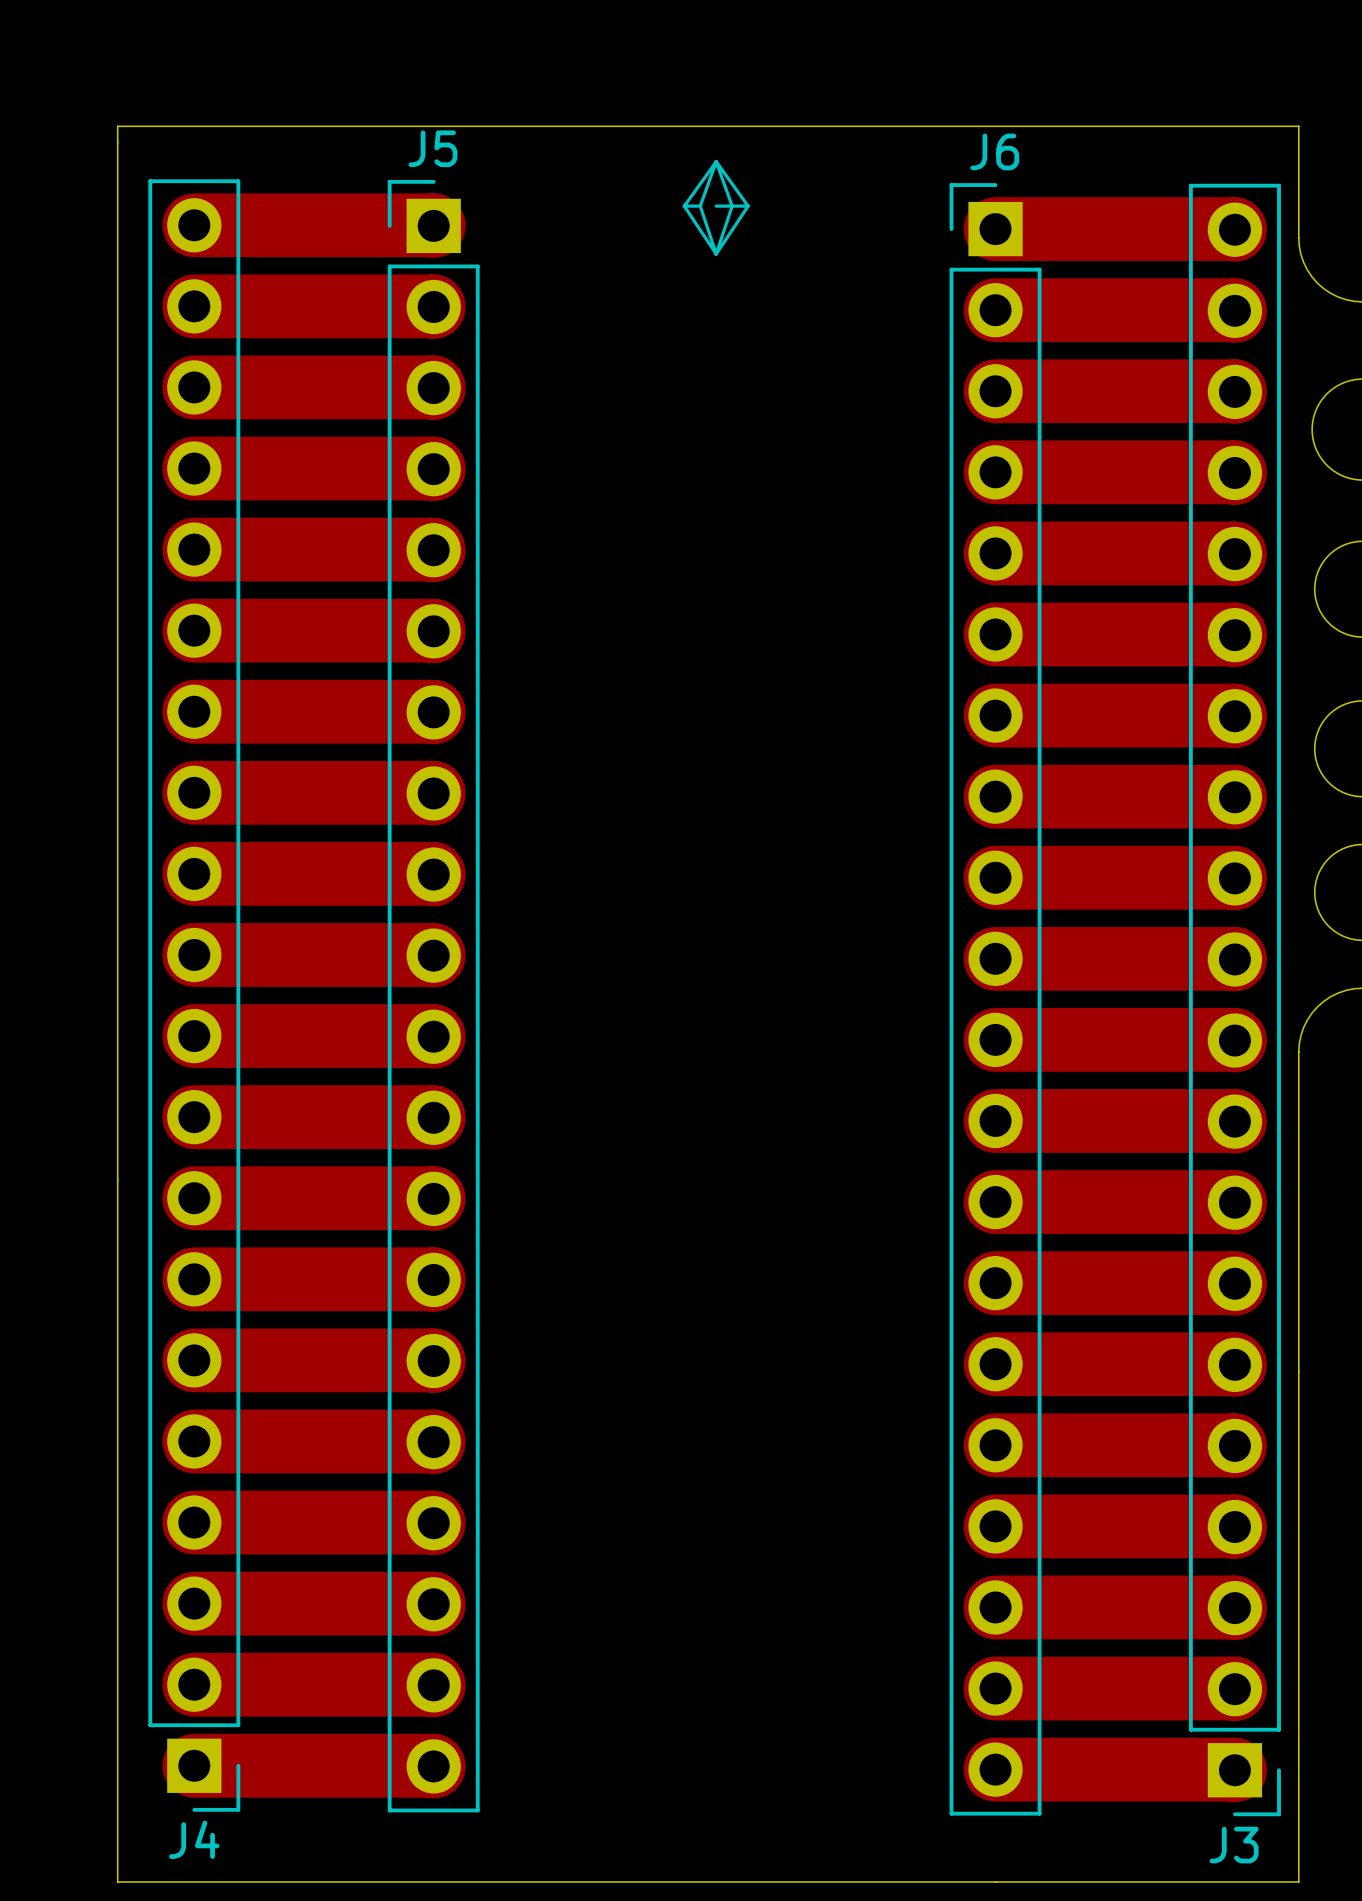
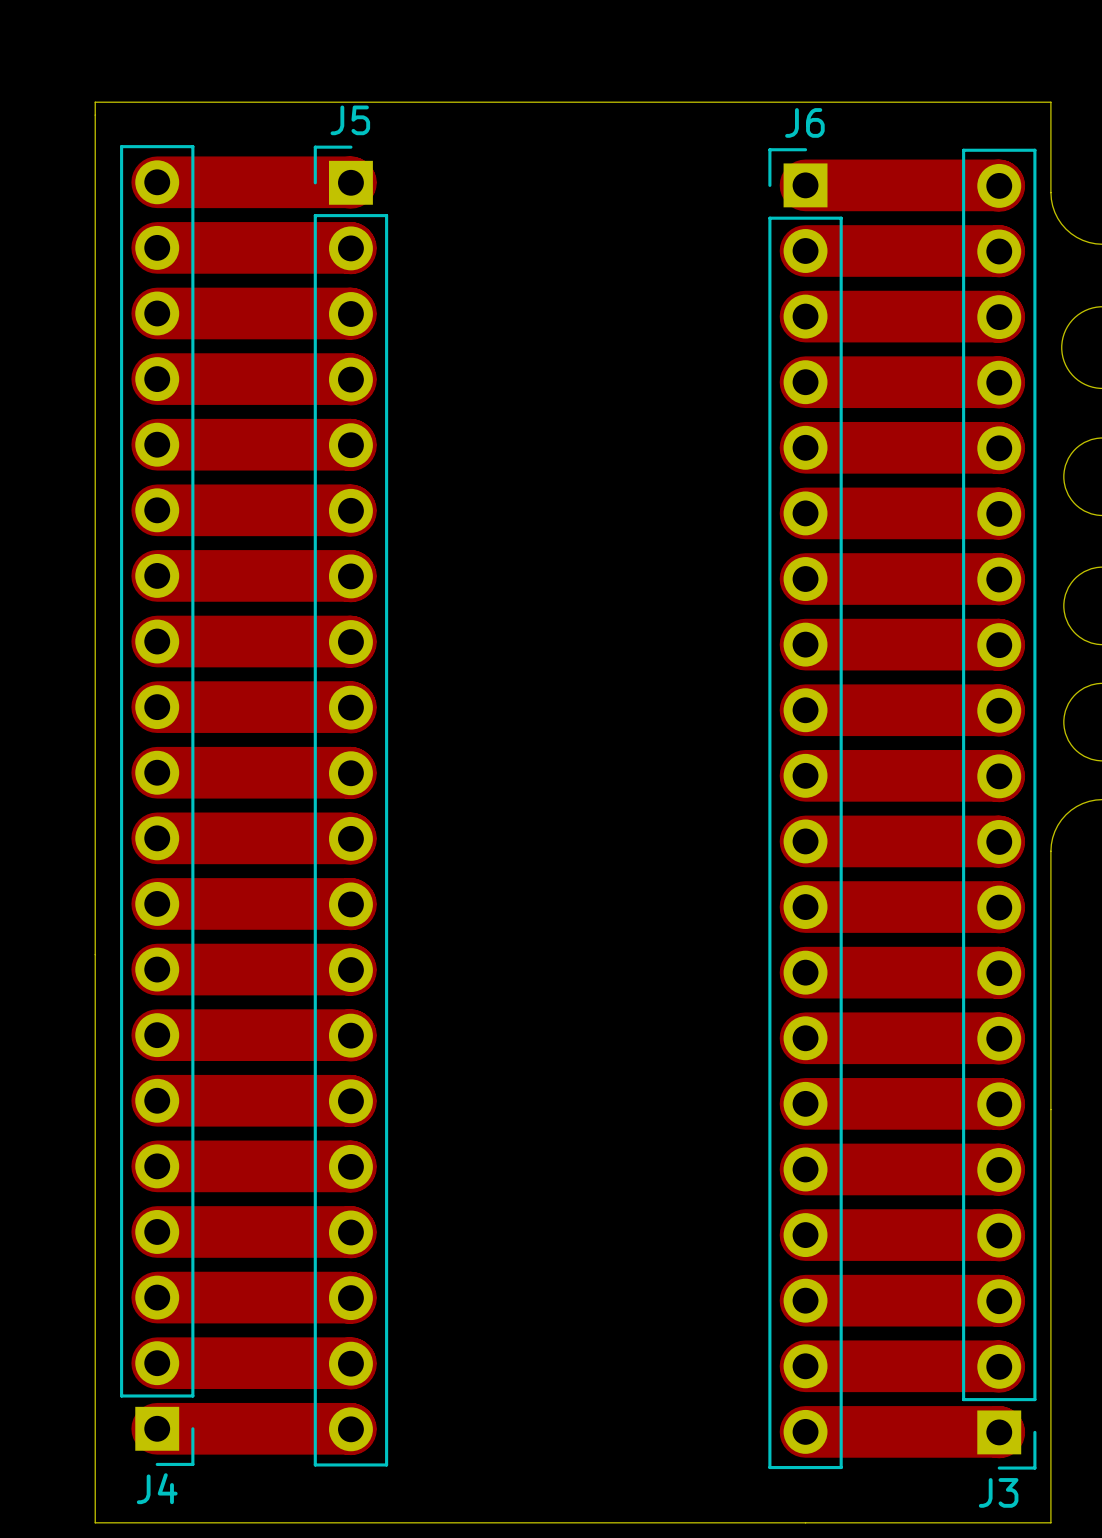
line: (716, 161) (732, 206) (716, 254) -> none
line: (716, 161) (684, 206) -> none
line: (716, 161) (700, 206) -> none
line: (716, 161) (748, 206) -> none
line: (684, 206) (716, 254) -> none
line: (684, 206) (700, 206) -> none
line: (700, 206) (716, 254) -> none
line: (716, 206) (748, 206) -> none
line: (748, 206) (716, 254) -> none

